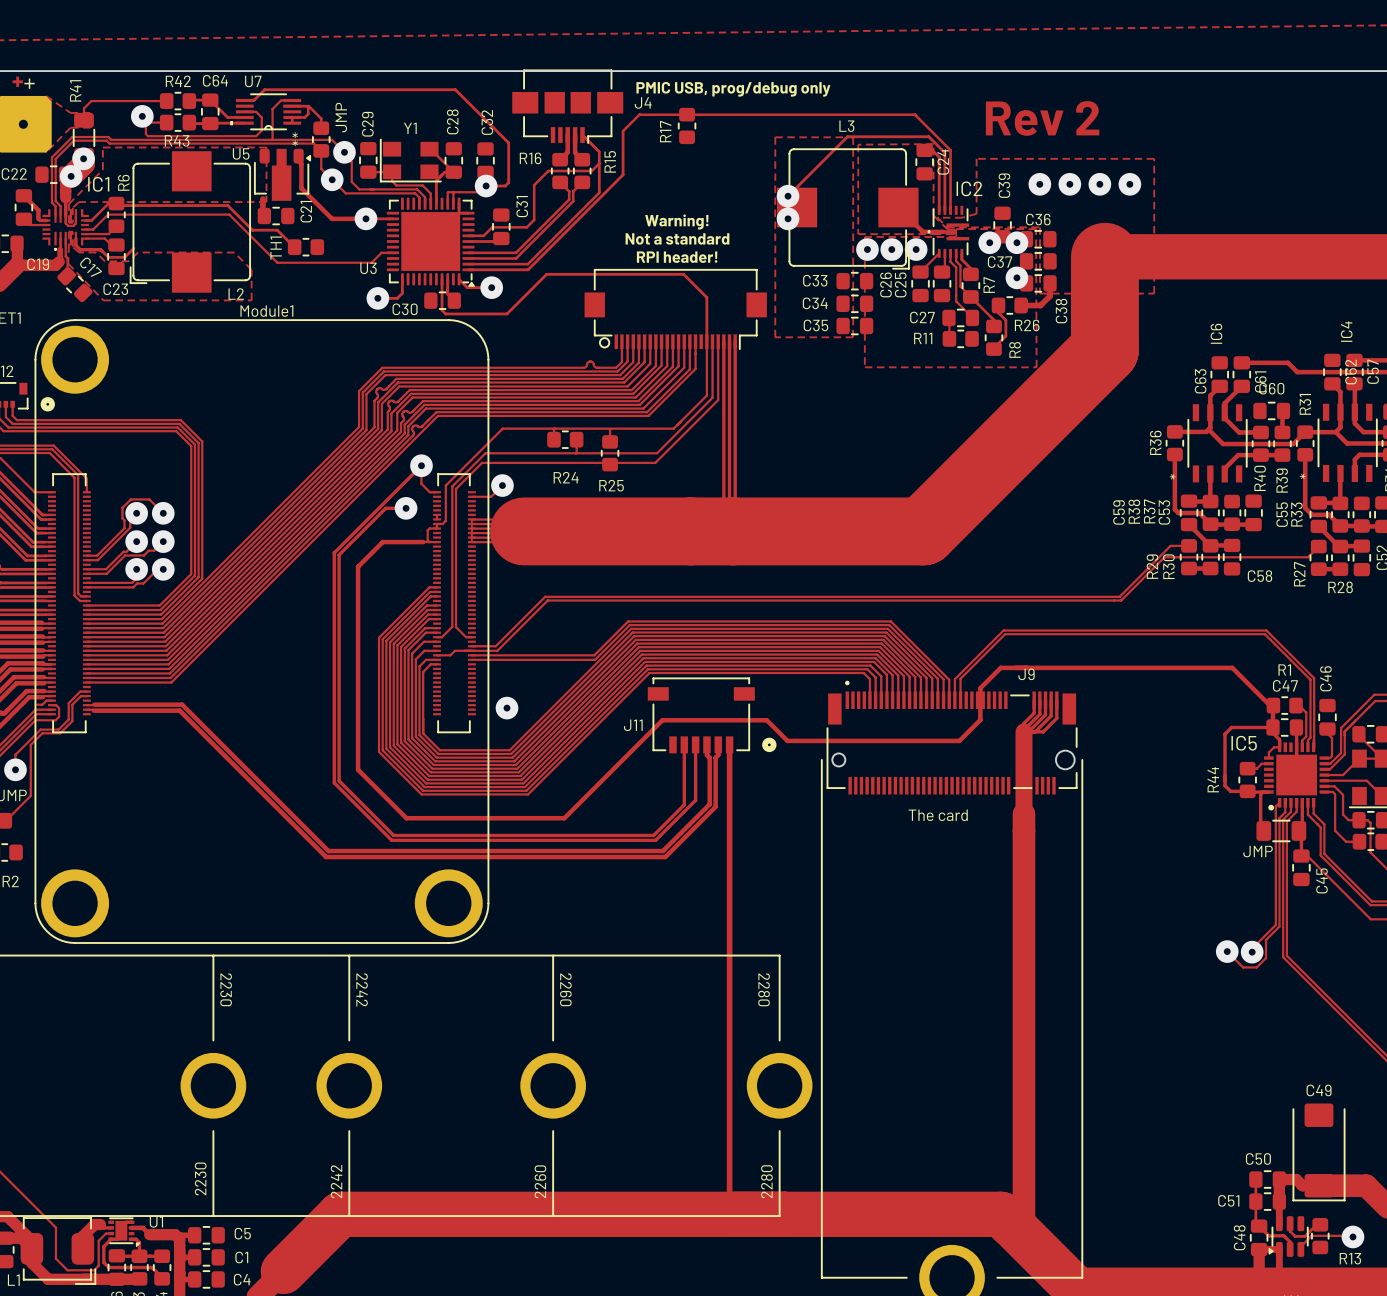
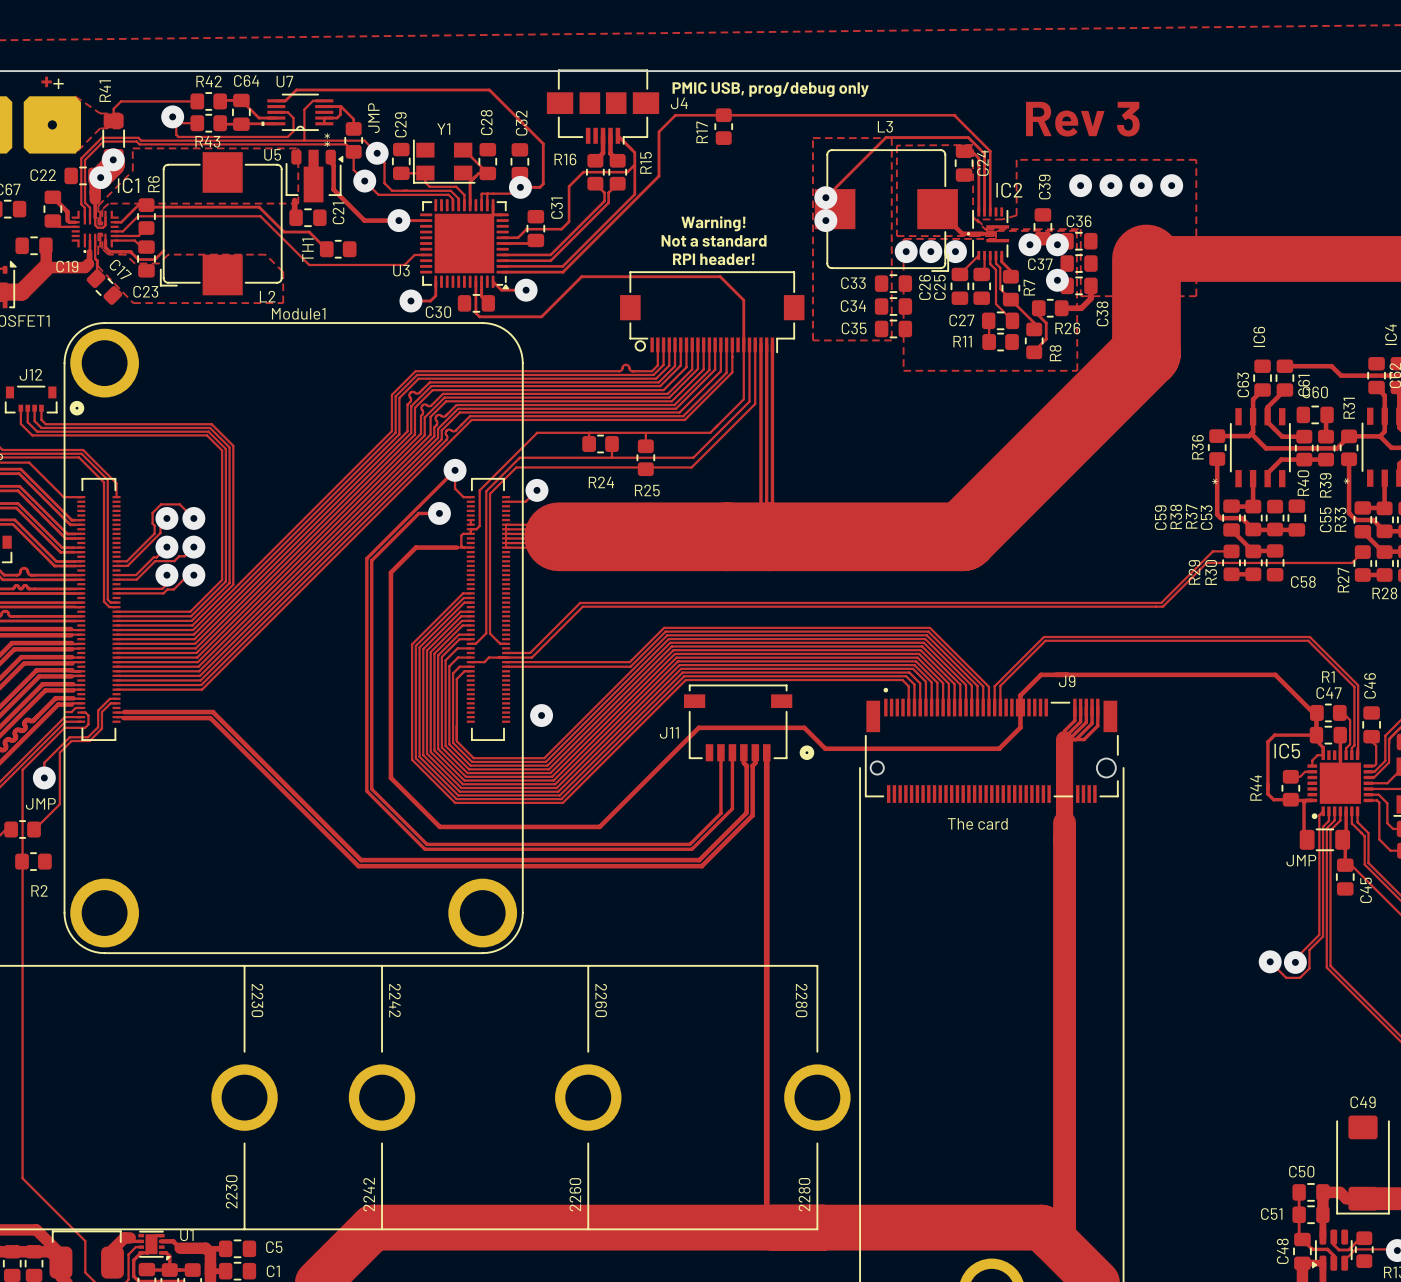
text: Rev 2 (1042, 118) -> Rev 3 (1082, 119)

